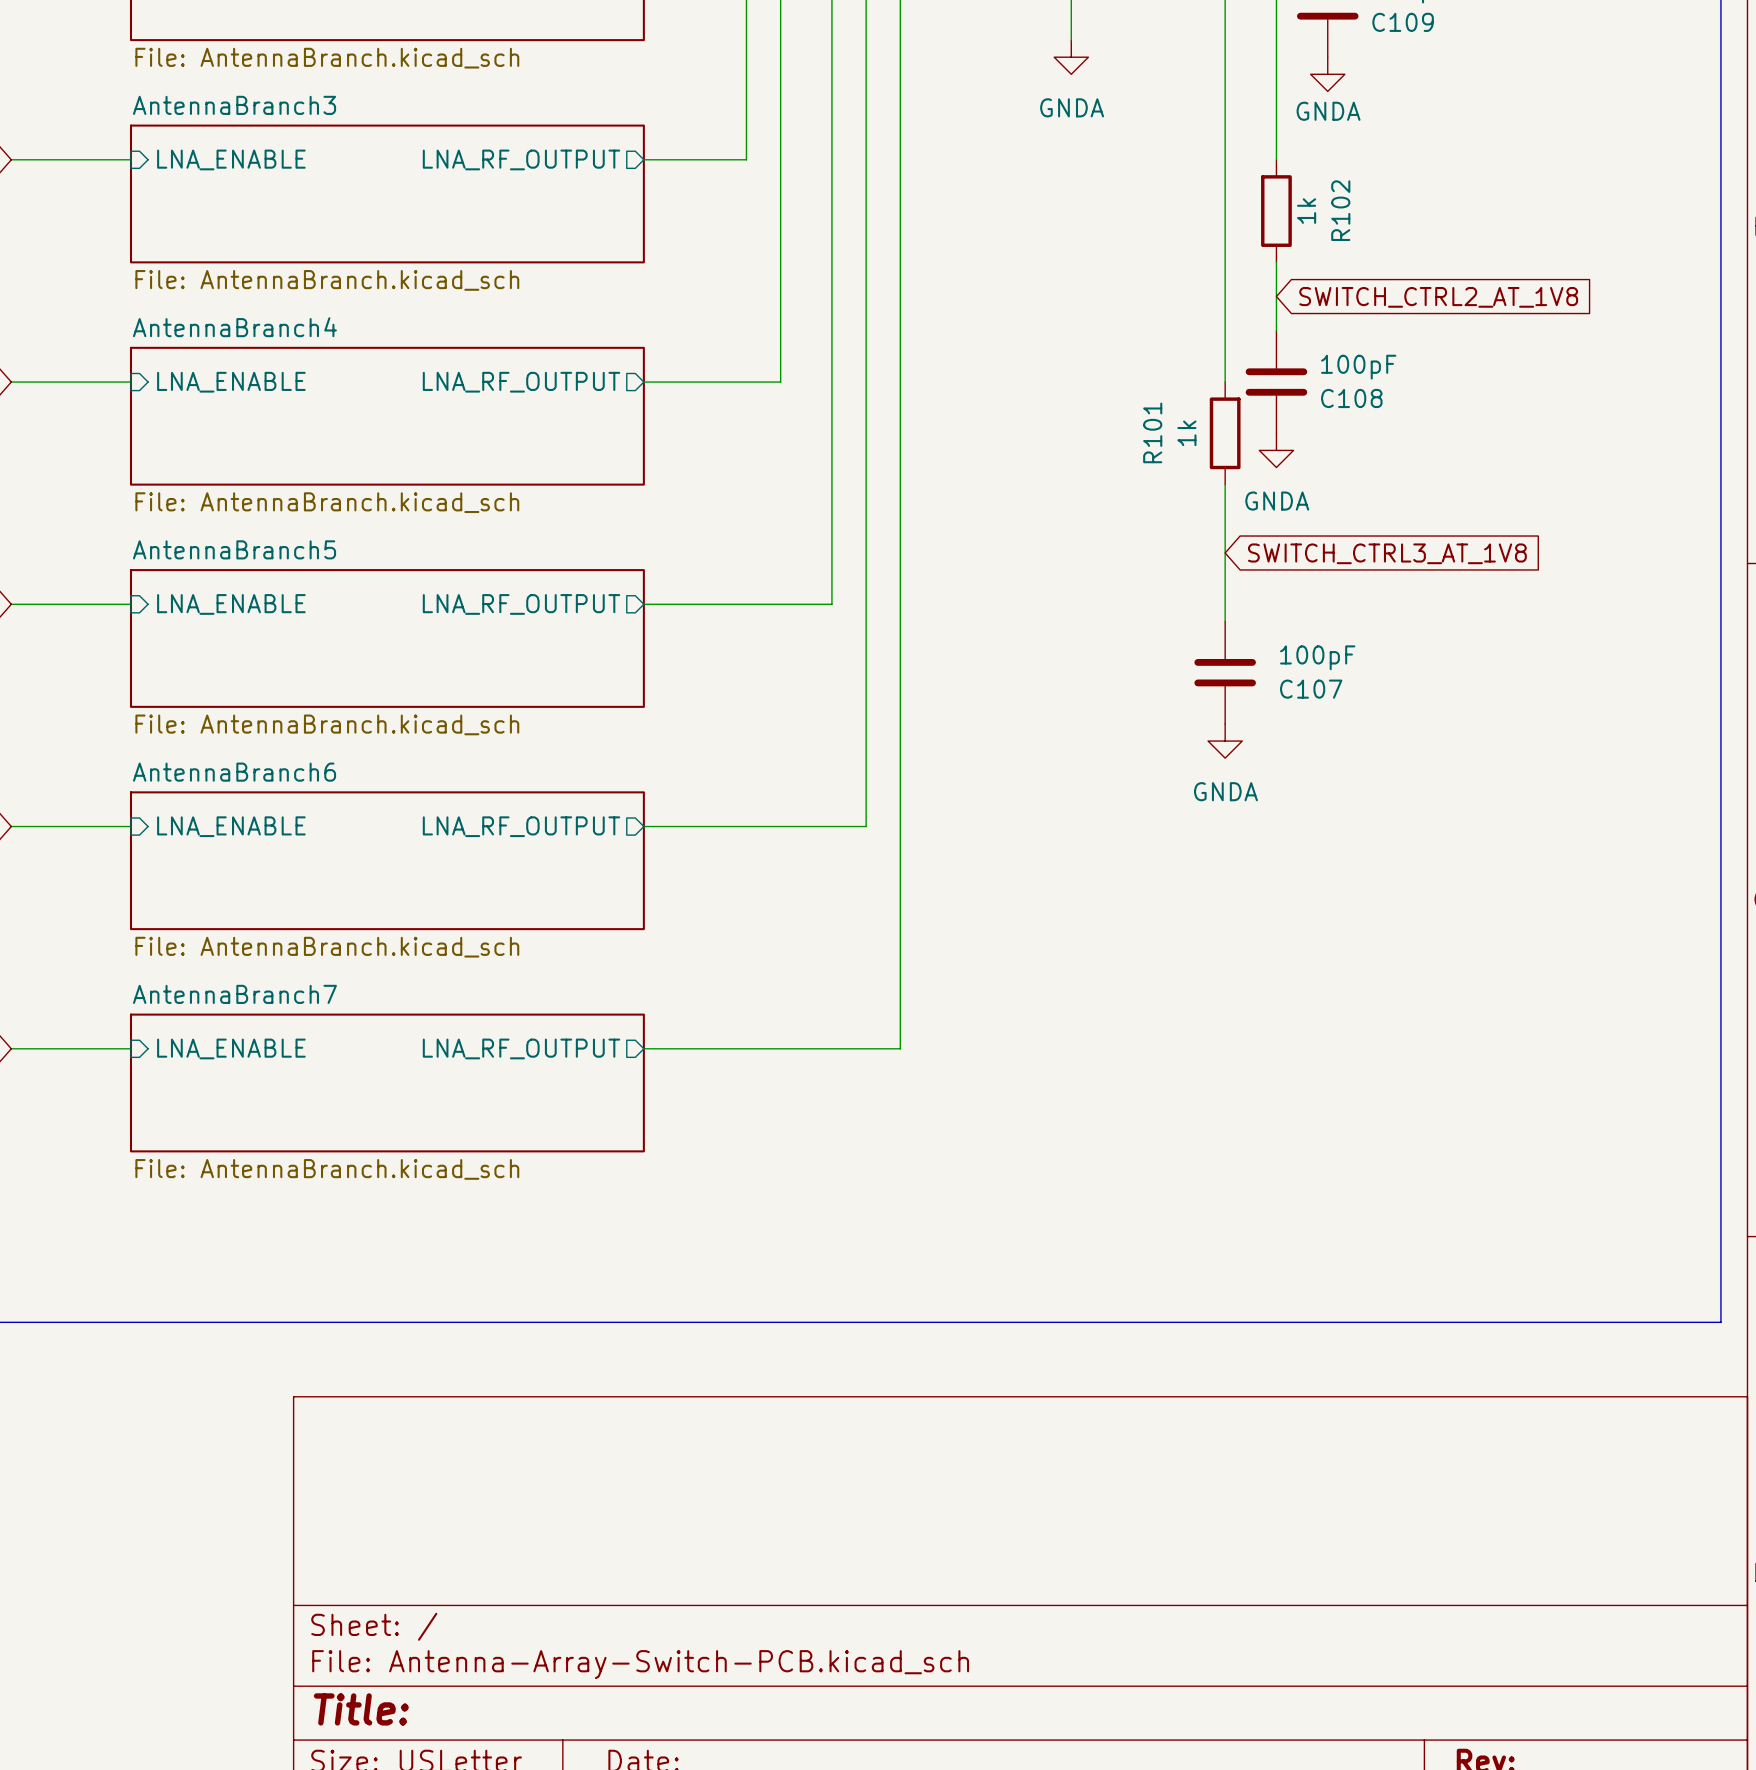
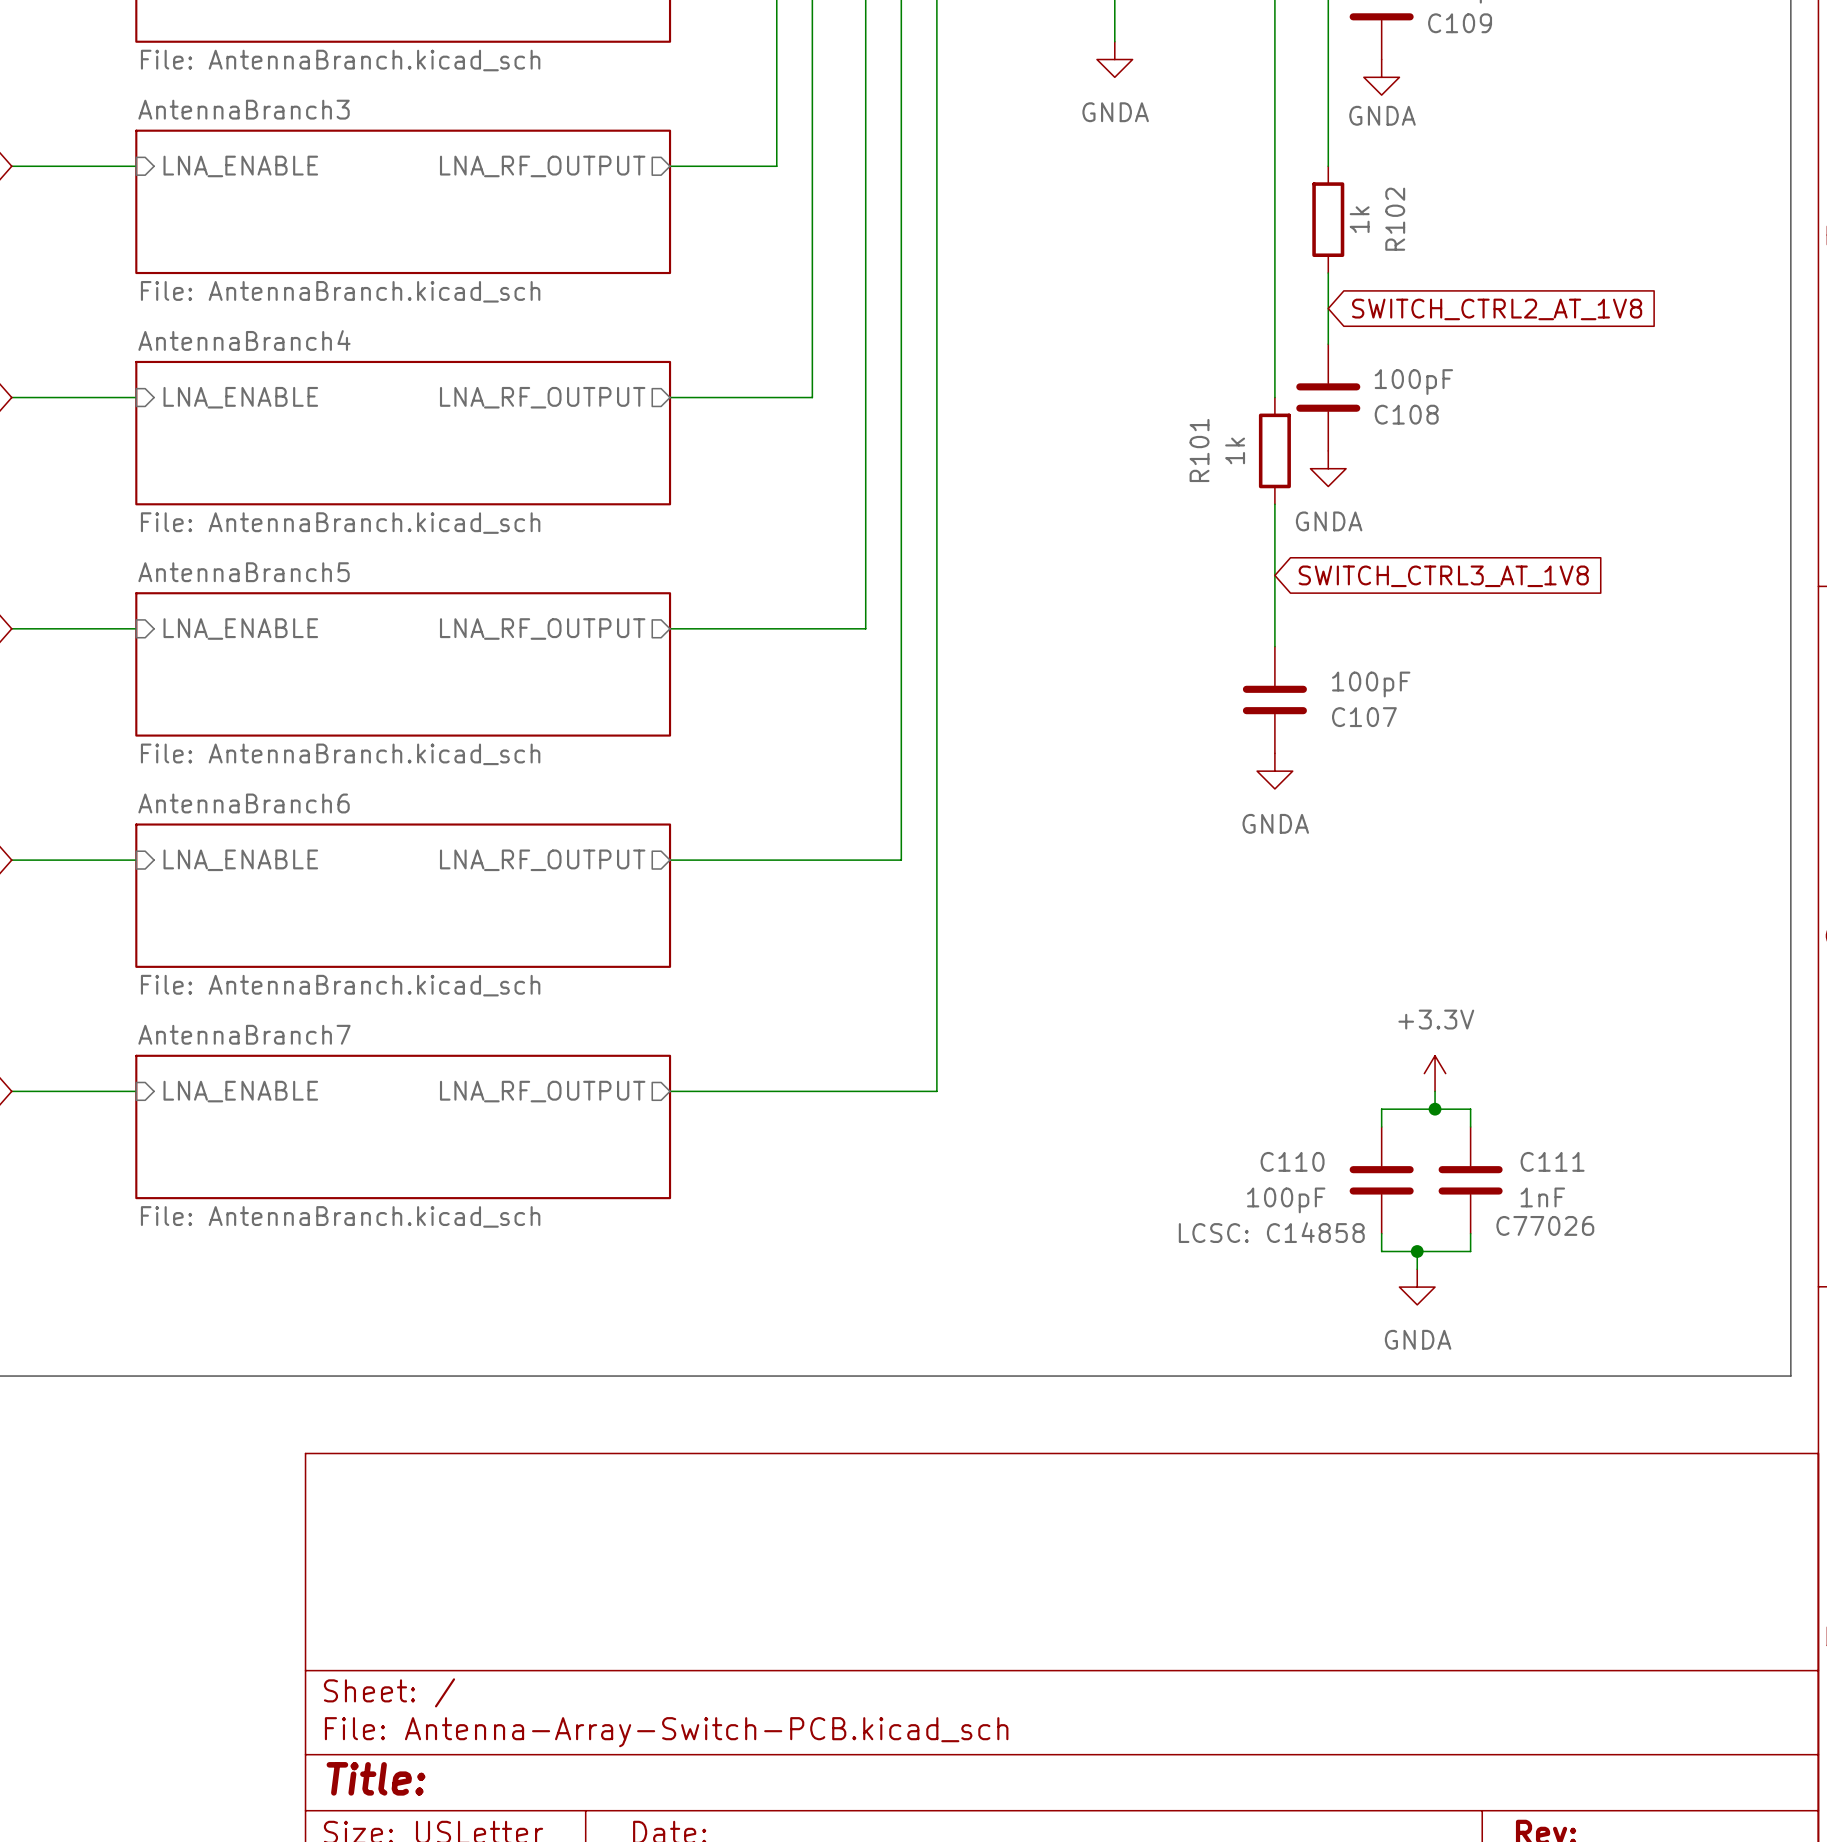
power symbol: none -> +3.3V (1435, 1073)
wire: none -> (1435, 1091) (1435, 1109)
junction: none -> (1435, 1109)
wire: none -> (1381, 1126) (1381, 1109) (1470, 1109) (1470, 1126)
C110: none -> 100pF (1381, 1180)
C111: none -> 1nF (1470, 1180)
wire: none -> (1381, 1233) (1381, 1251) (1470, 1251) (1470, 1233)
wire: none -> (1417, 1251) (1417, 1269)
junction: none -> (1417, 1251)
power symbol: none -> GNDA (1417, 1287)

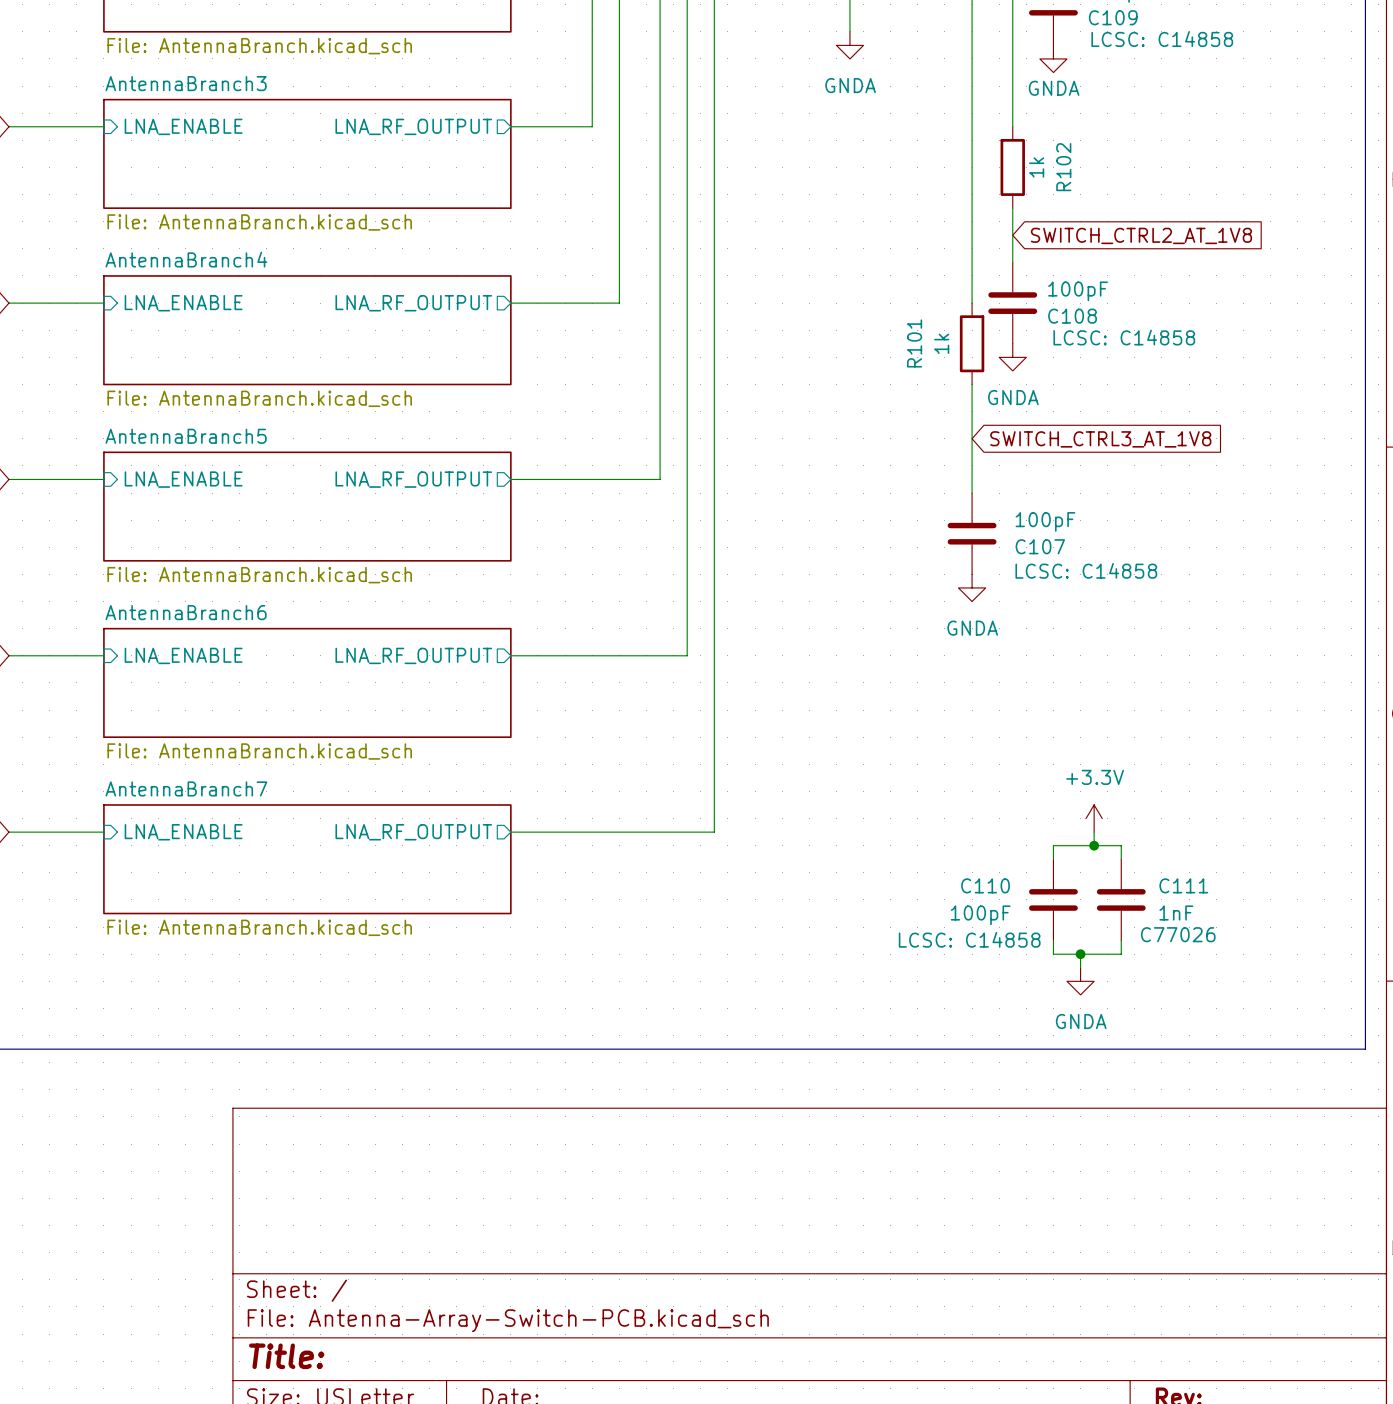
C109 text: none -> LCSC: C14858 (1162, 39)
C108 text: none -> LCSC: C14858 (1124, 337)
C107 text: none -> LCSC: C14858 (1086, 570)

